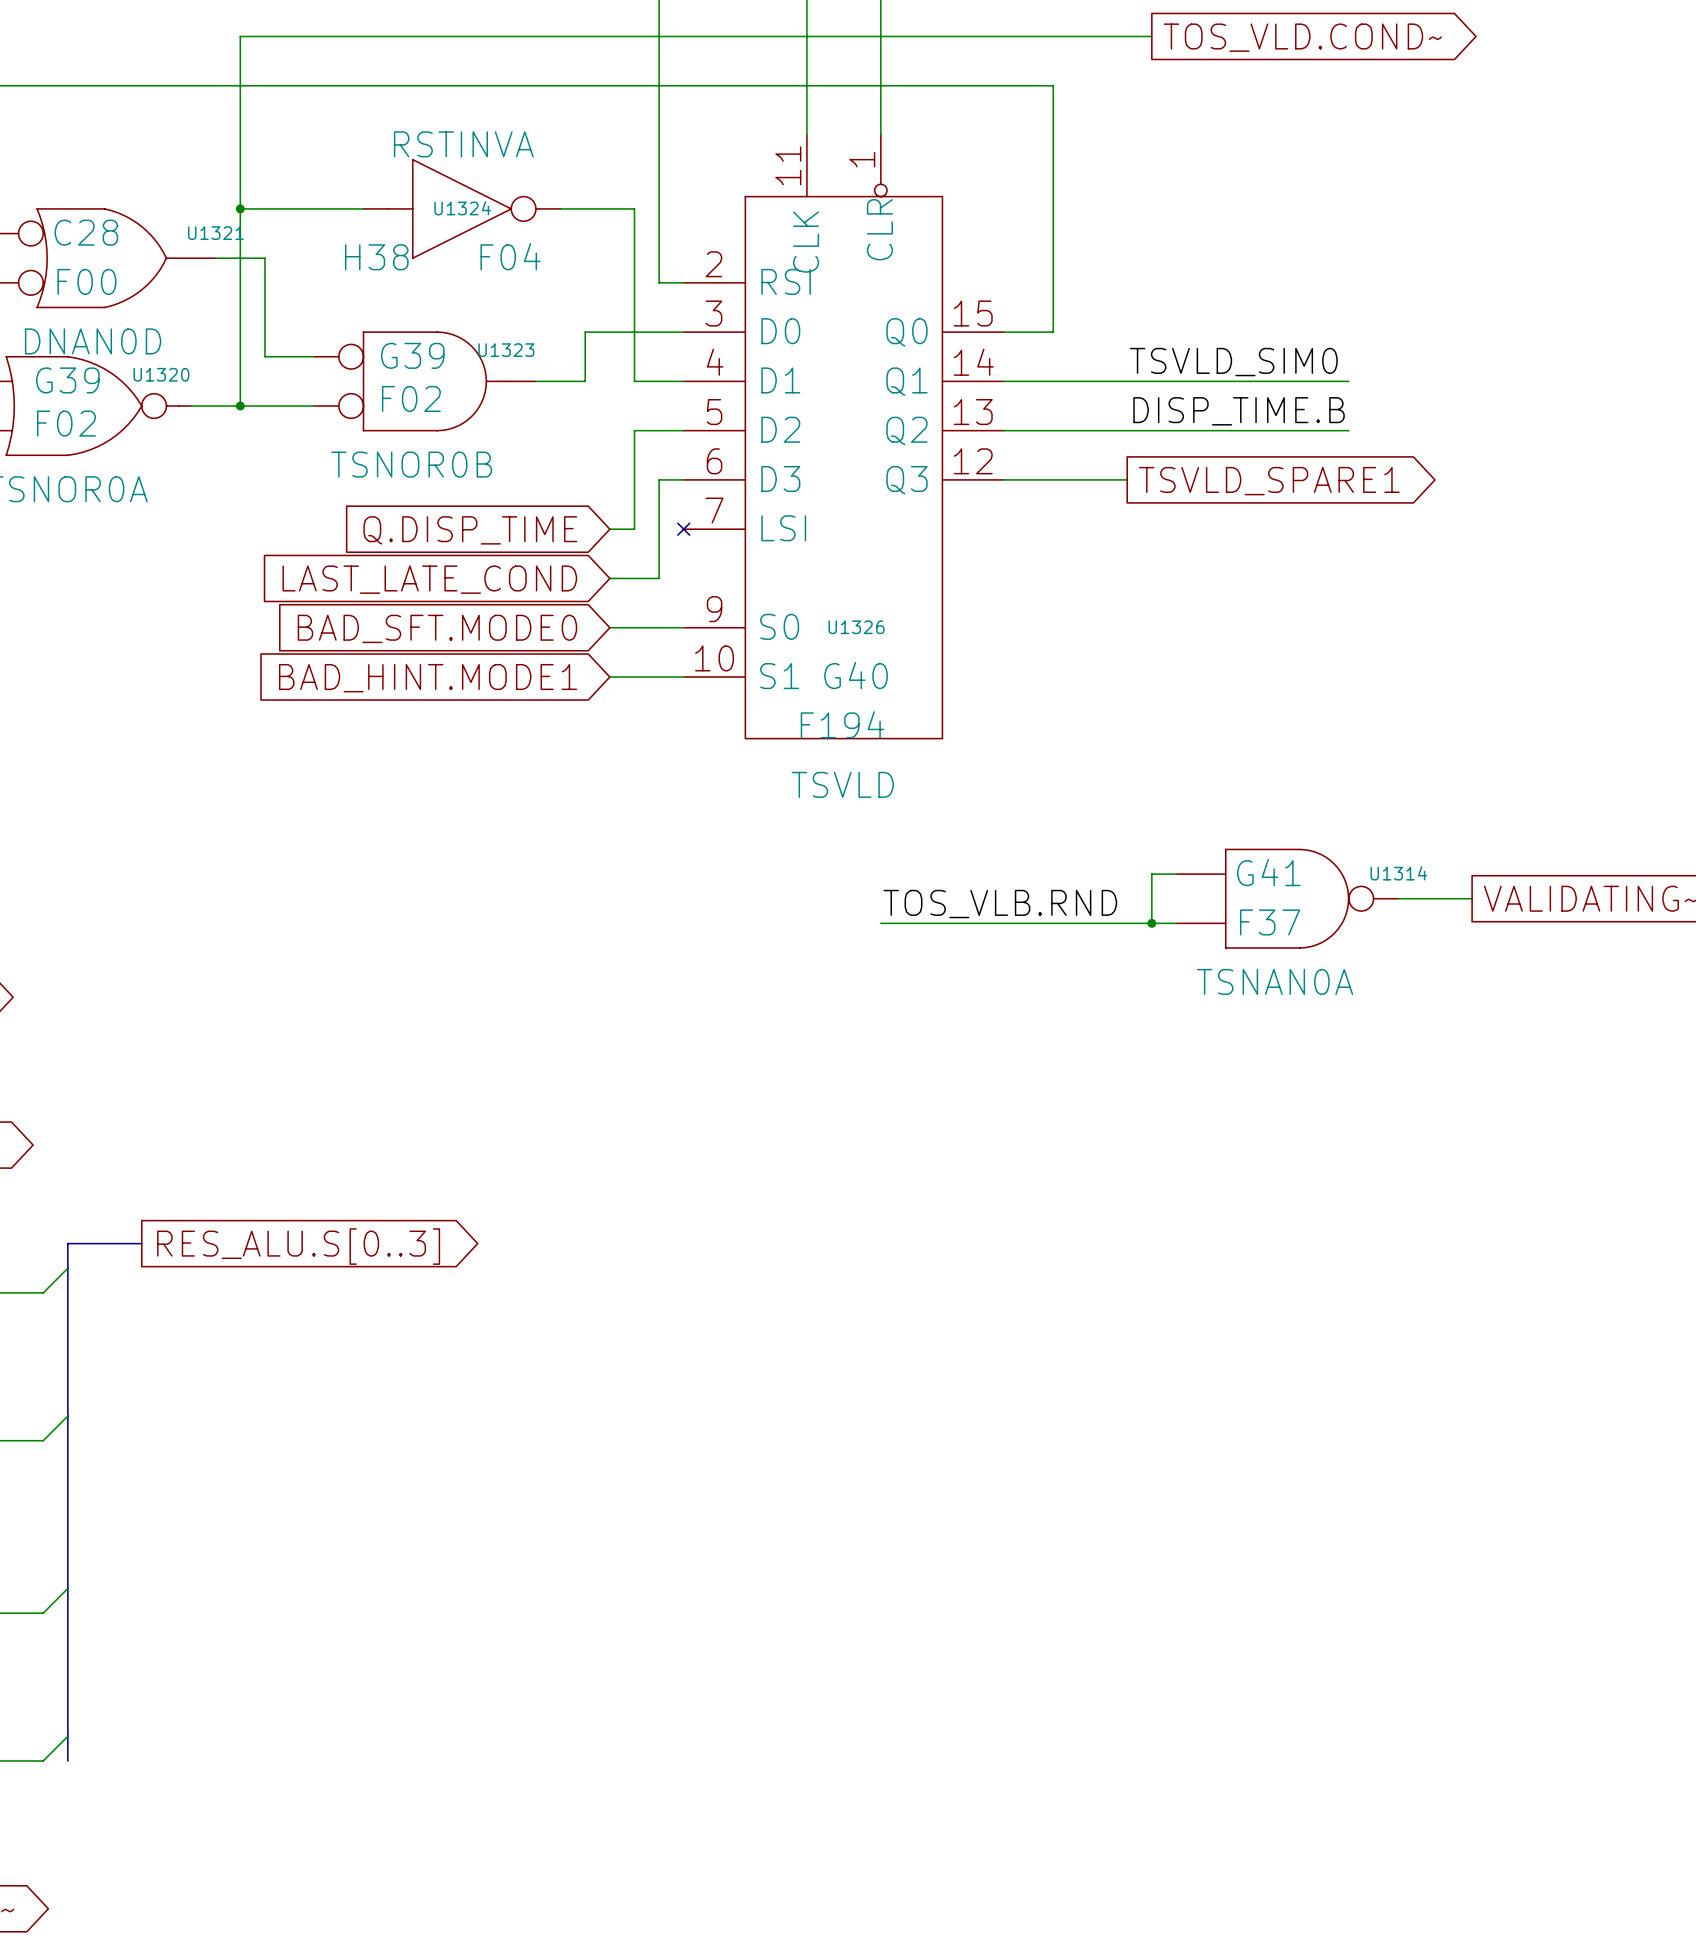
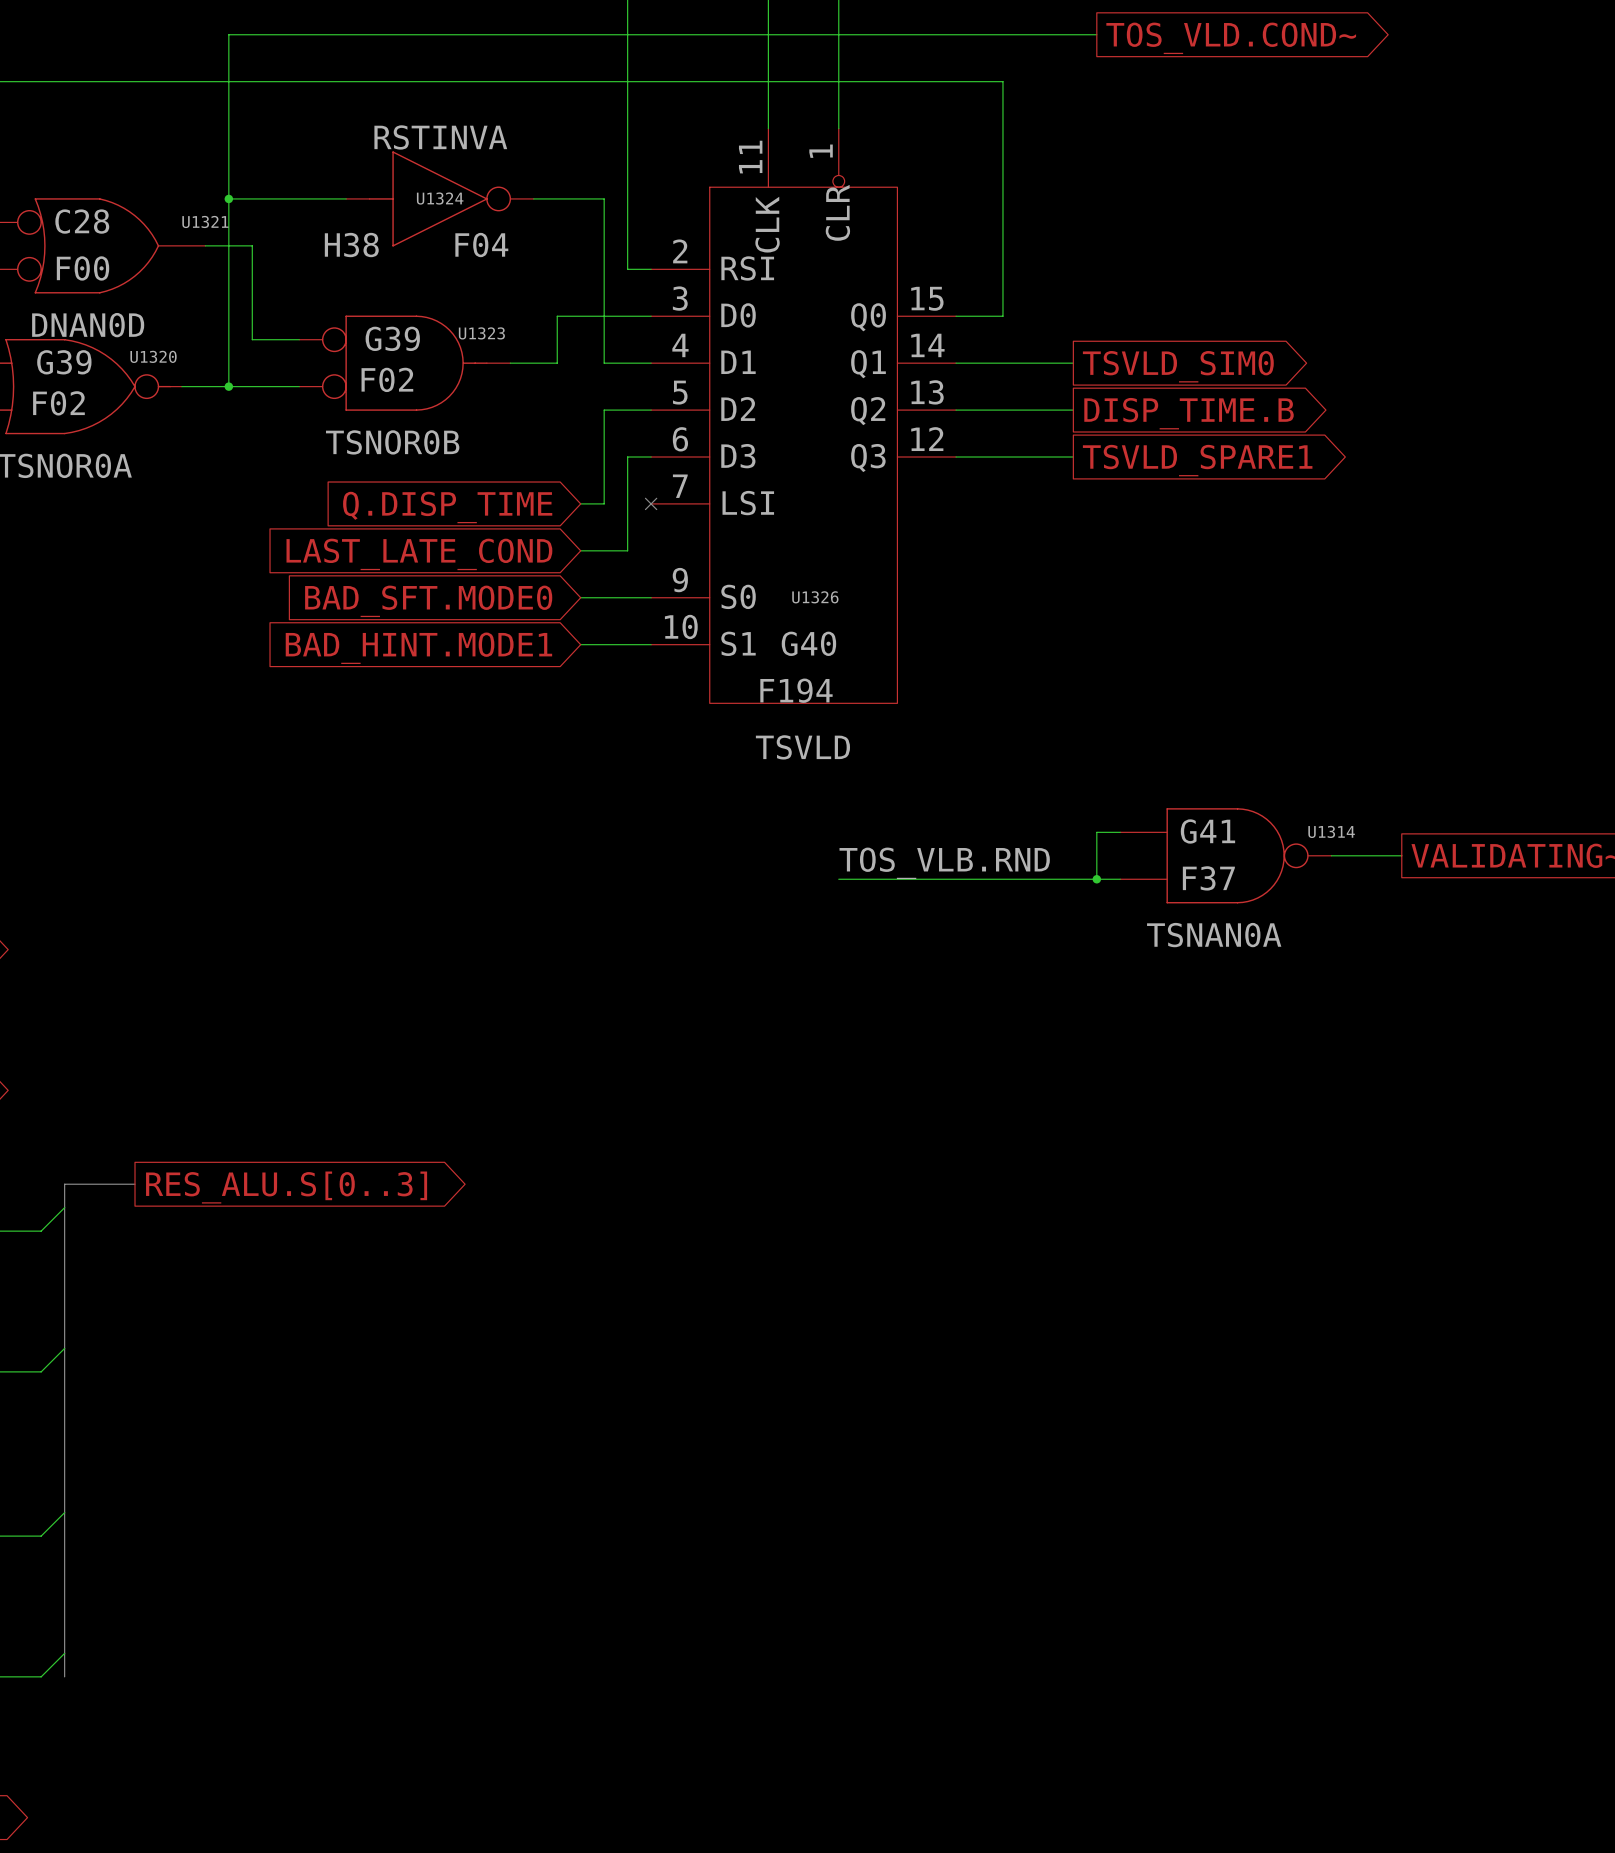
label: TSVLD_SIM0 (1233, 362) -> none
wire: (1127, 381) (1348, 381) -> none
global label: none -> TSVLD_SIM0 (1178, 366)
label: DISP_TIME.B (1239, 411) -> none
wire: (1127, 430) (1348, 430) -> none
global label: none -> DISP_TIME.B (1189, 413)

